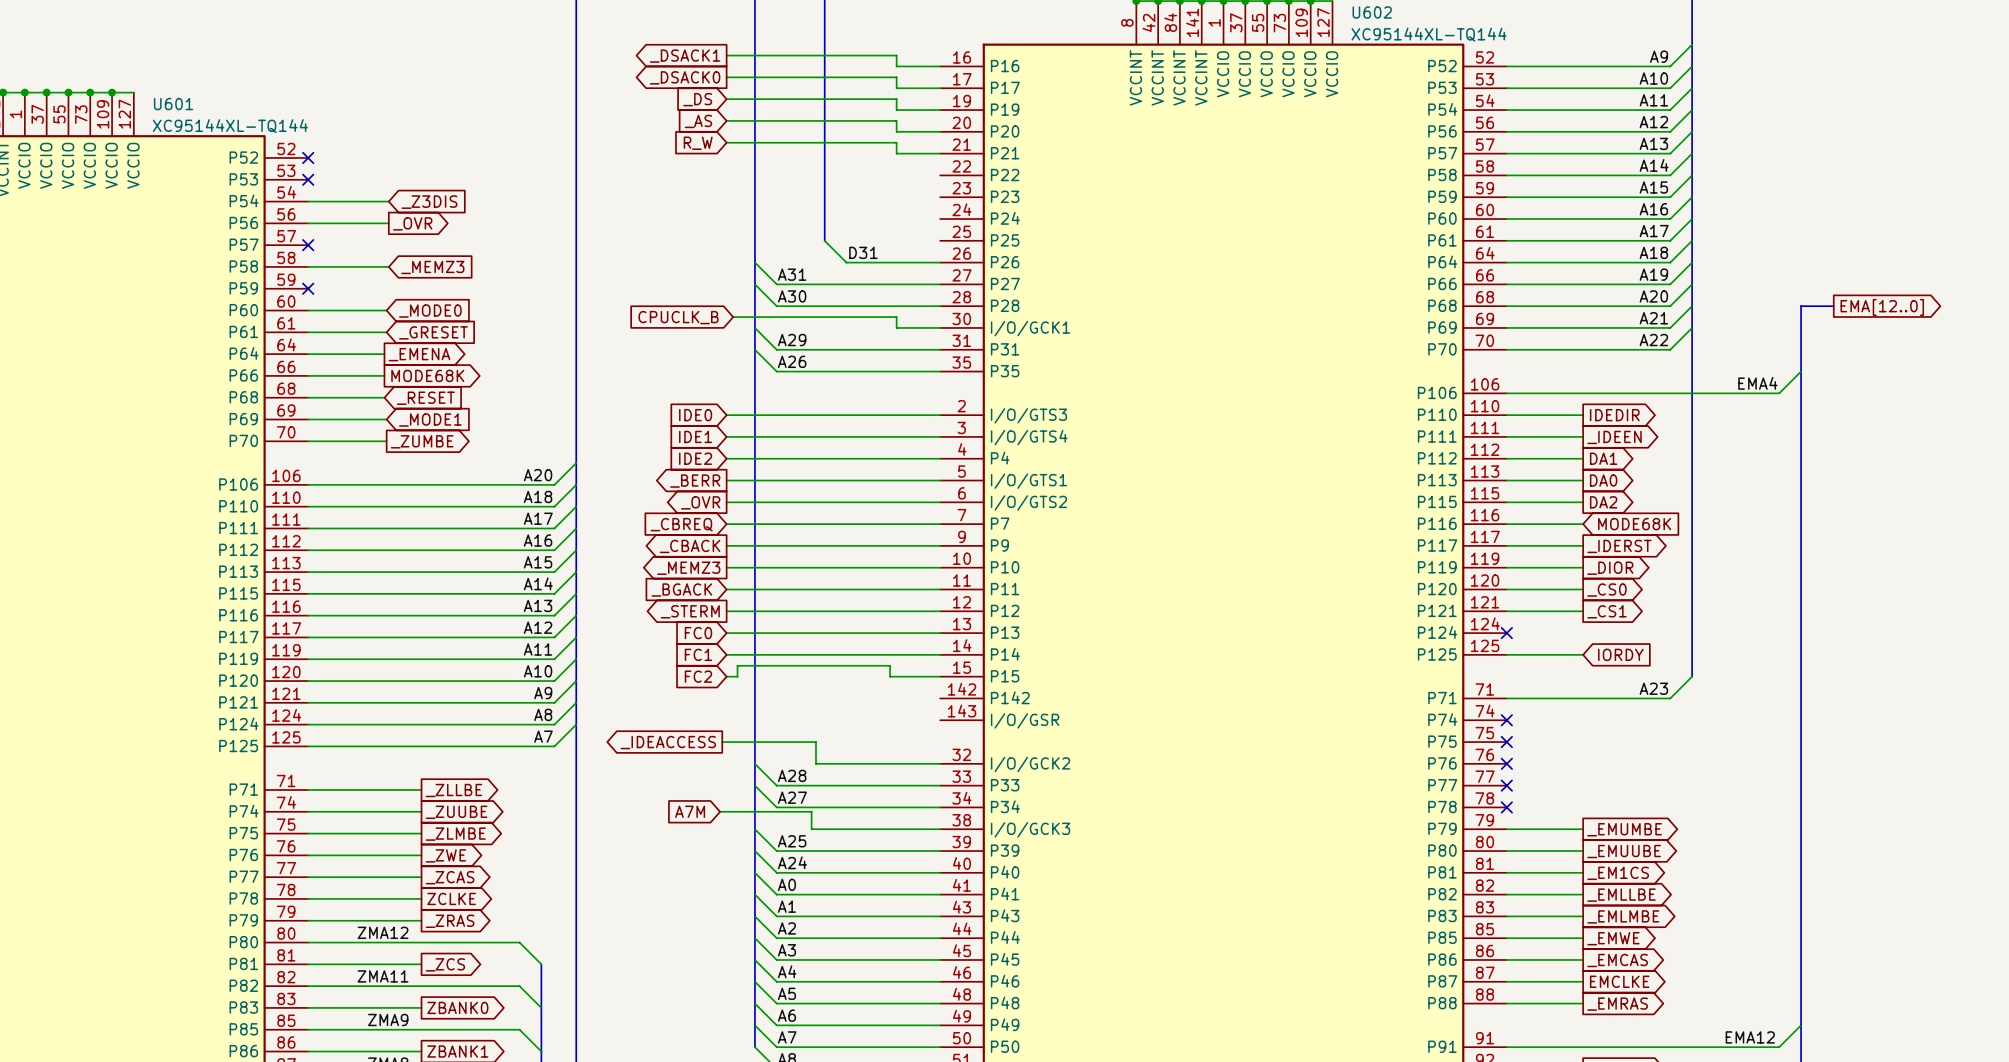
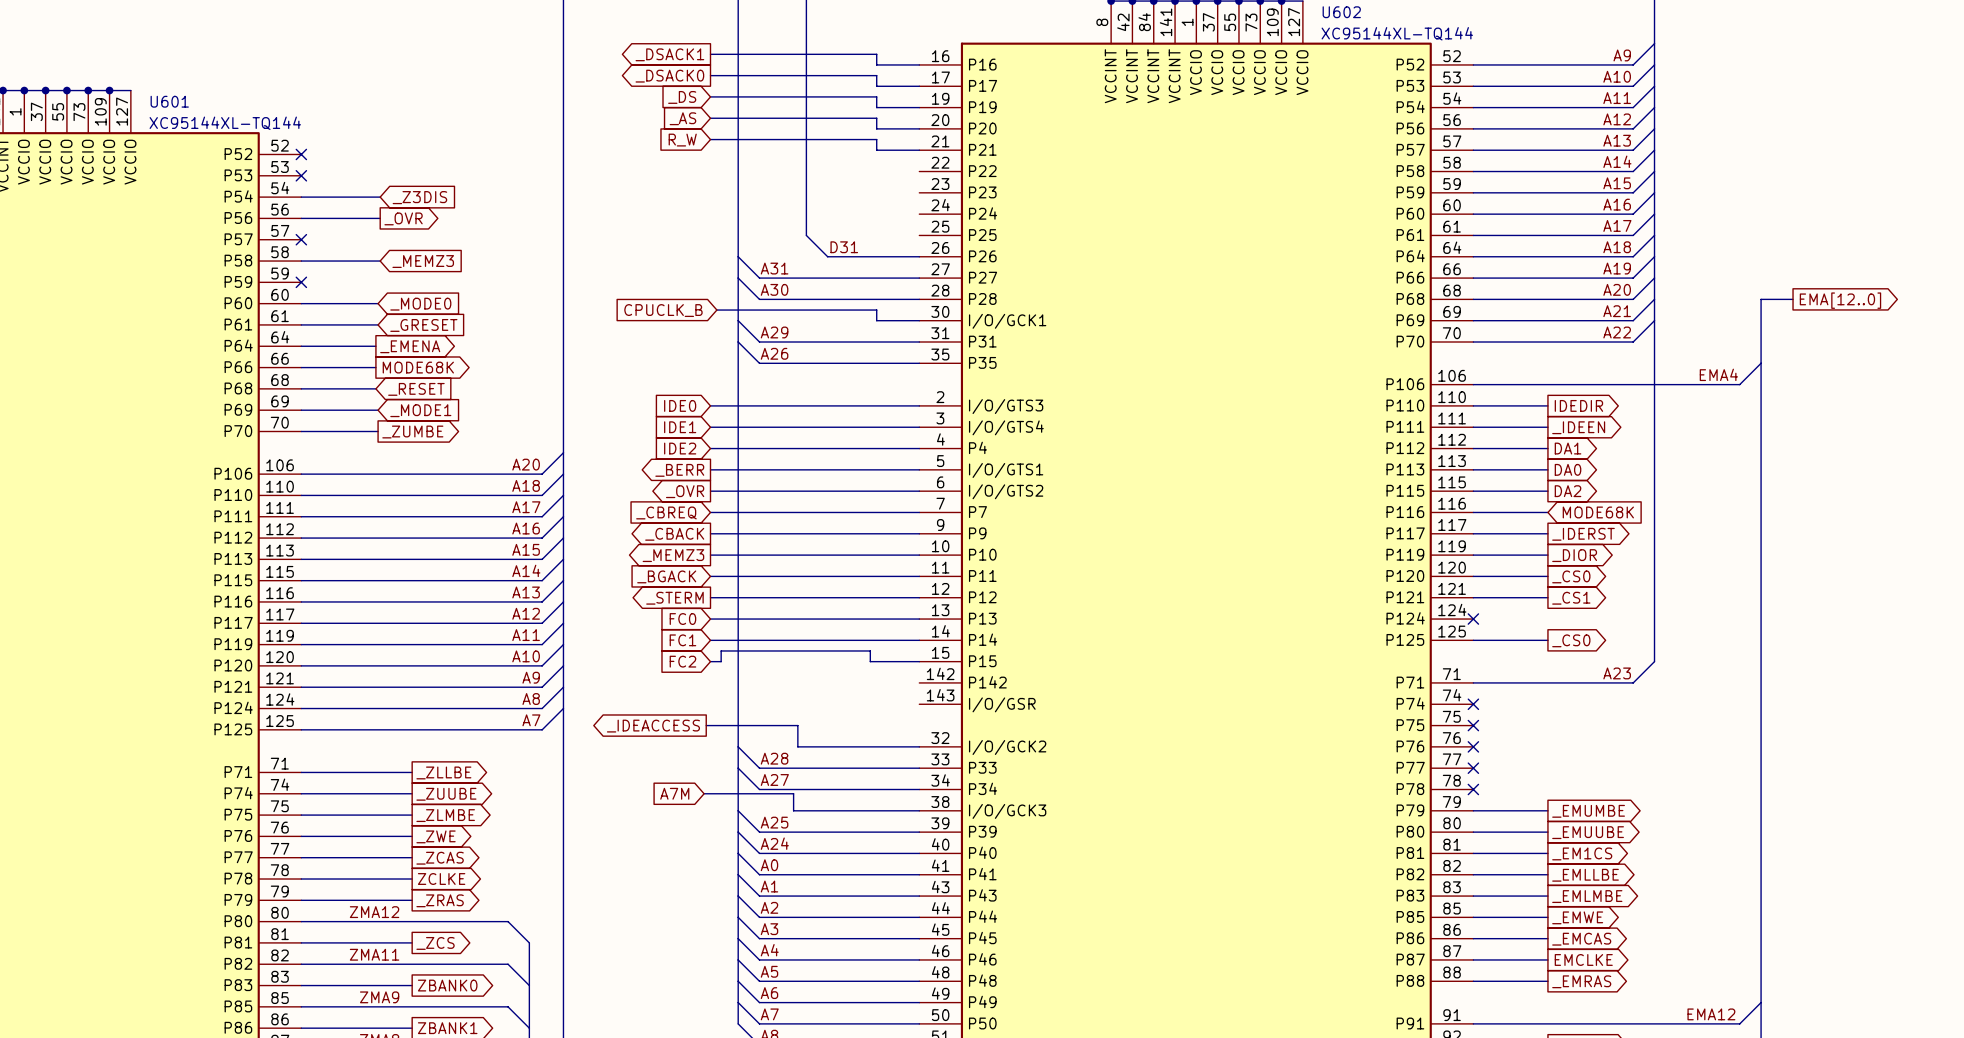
global label shape: input (1620, 654) -> output (1571, 640)
global label: IORDY (1620, 654) -> _CS0 (1571, 640)

